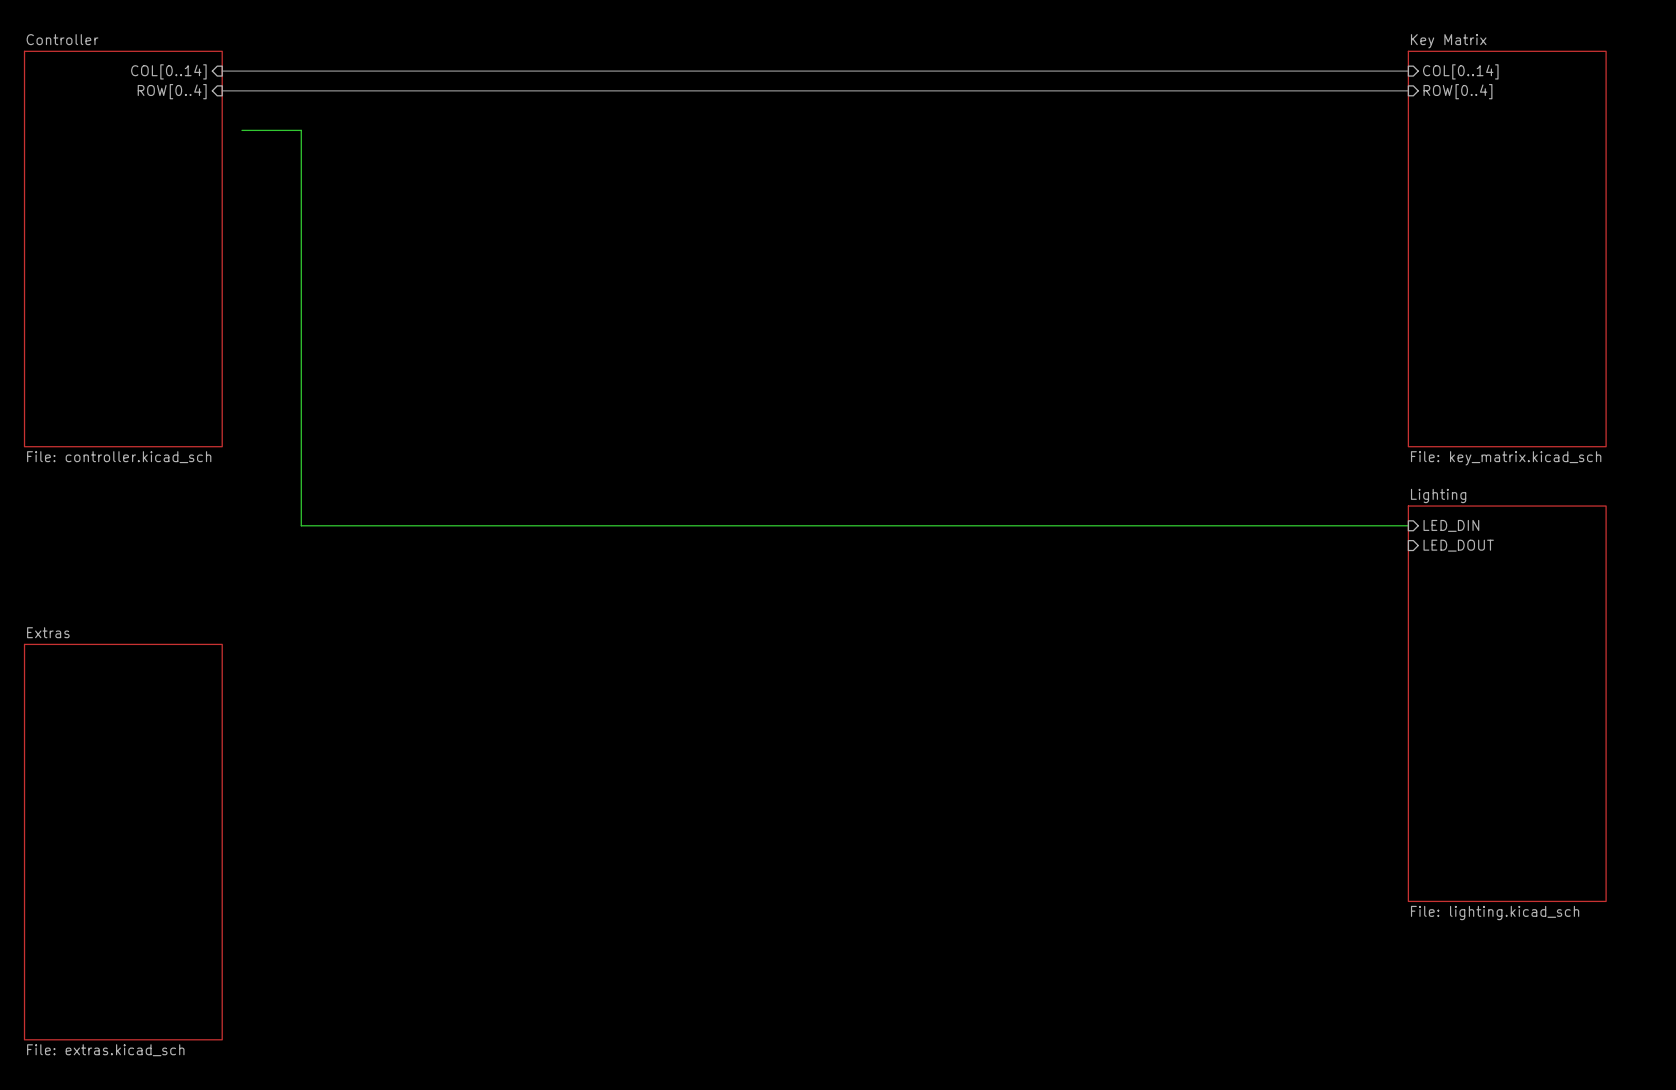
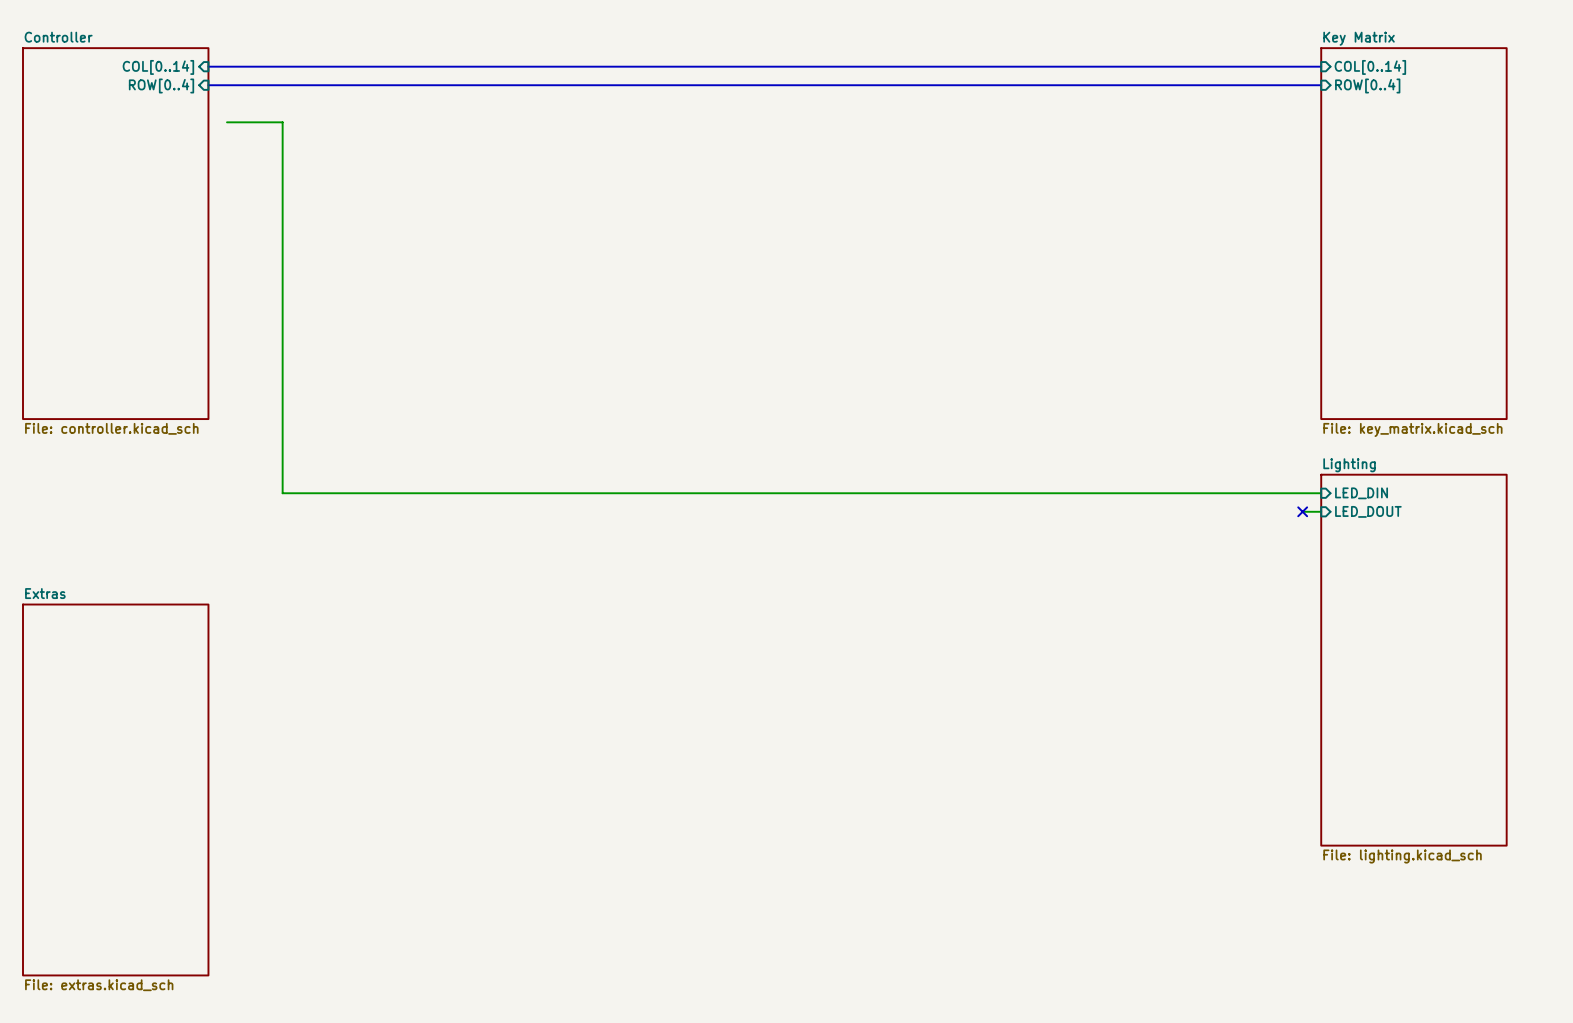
wire: none -> (1302, 511) (1321, 511)
no-connect mark: none -> (1302, 511)

